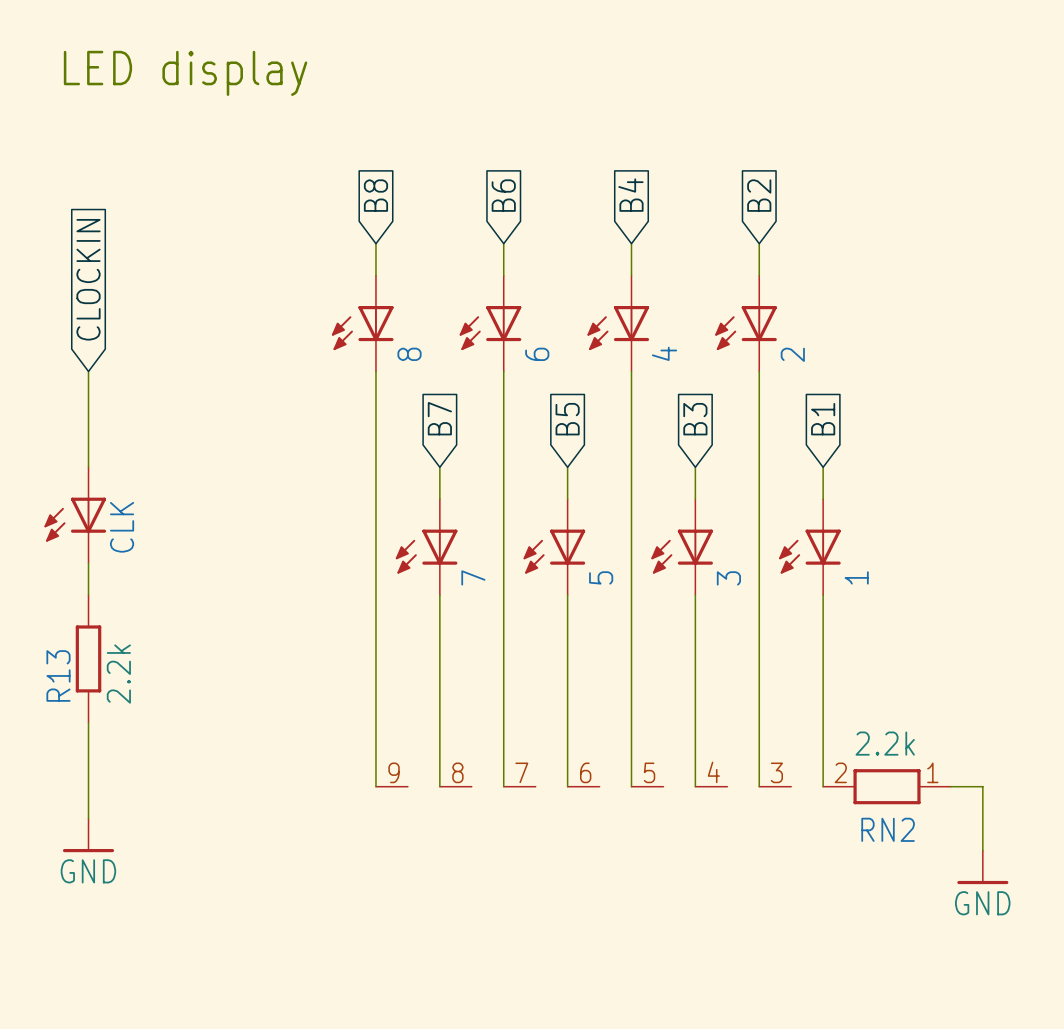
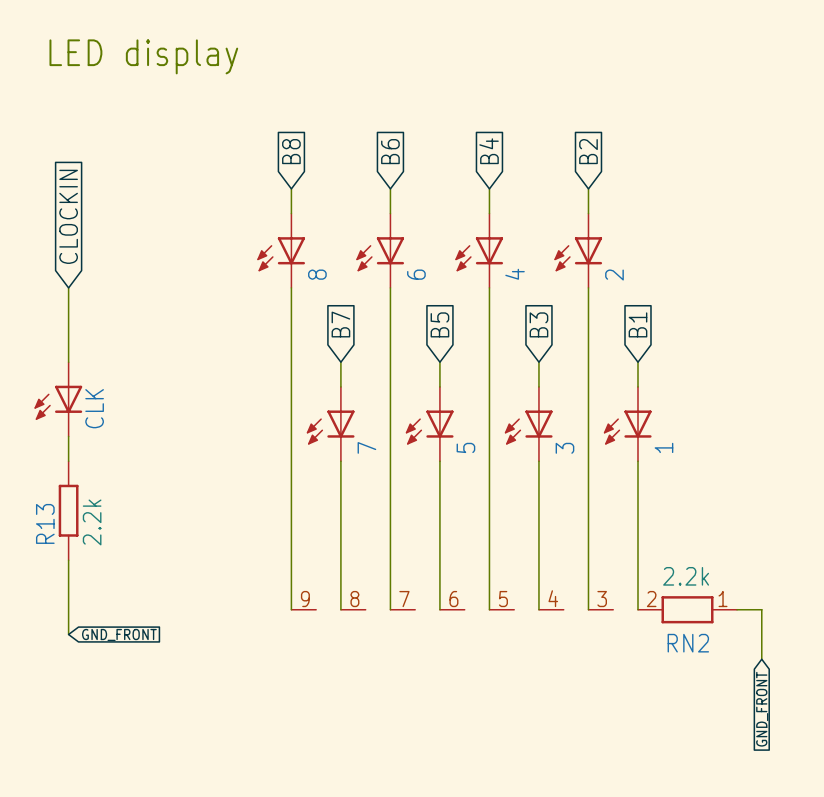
global label: none -> GND_FRONT (119, 634)
power symbol: GND (88, 835) -> none
power symbol: GND (982, 867) -> none
global label: none -> GND_FRONT (762, 709)

